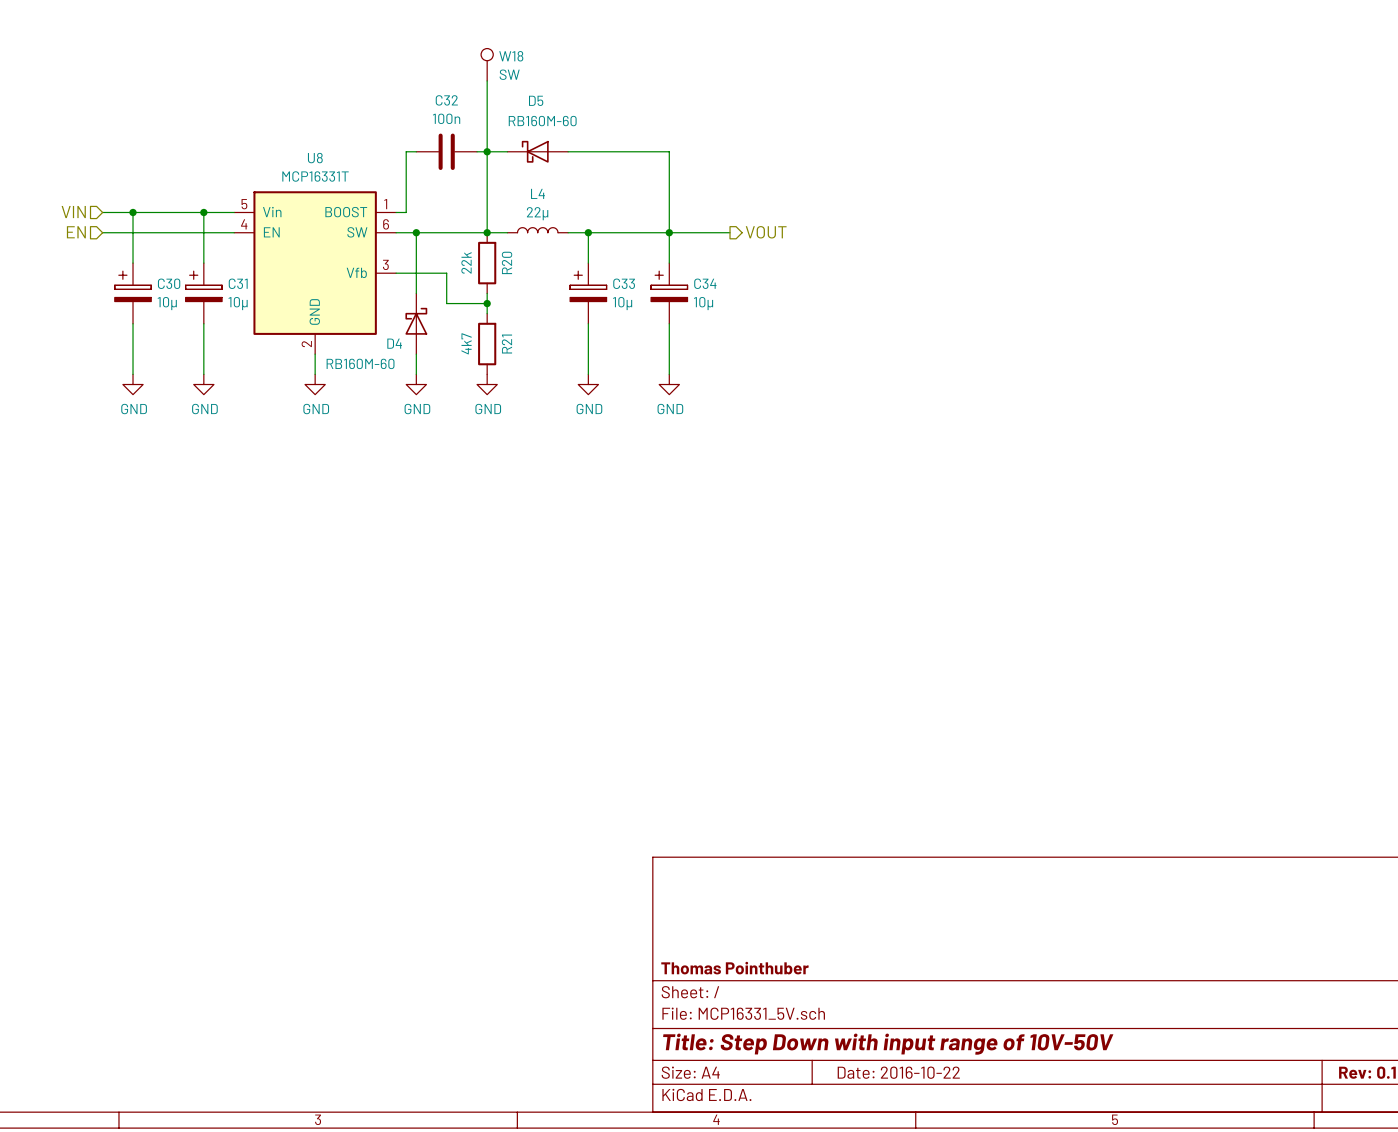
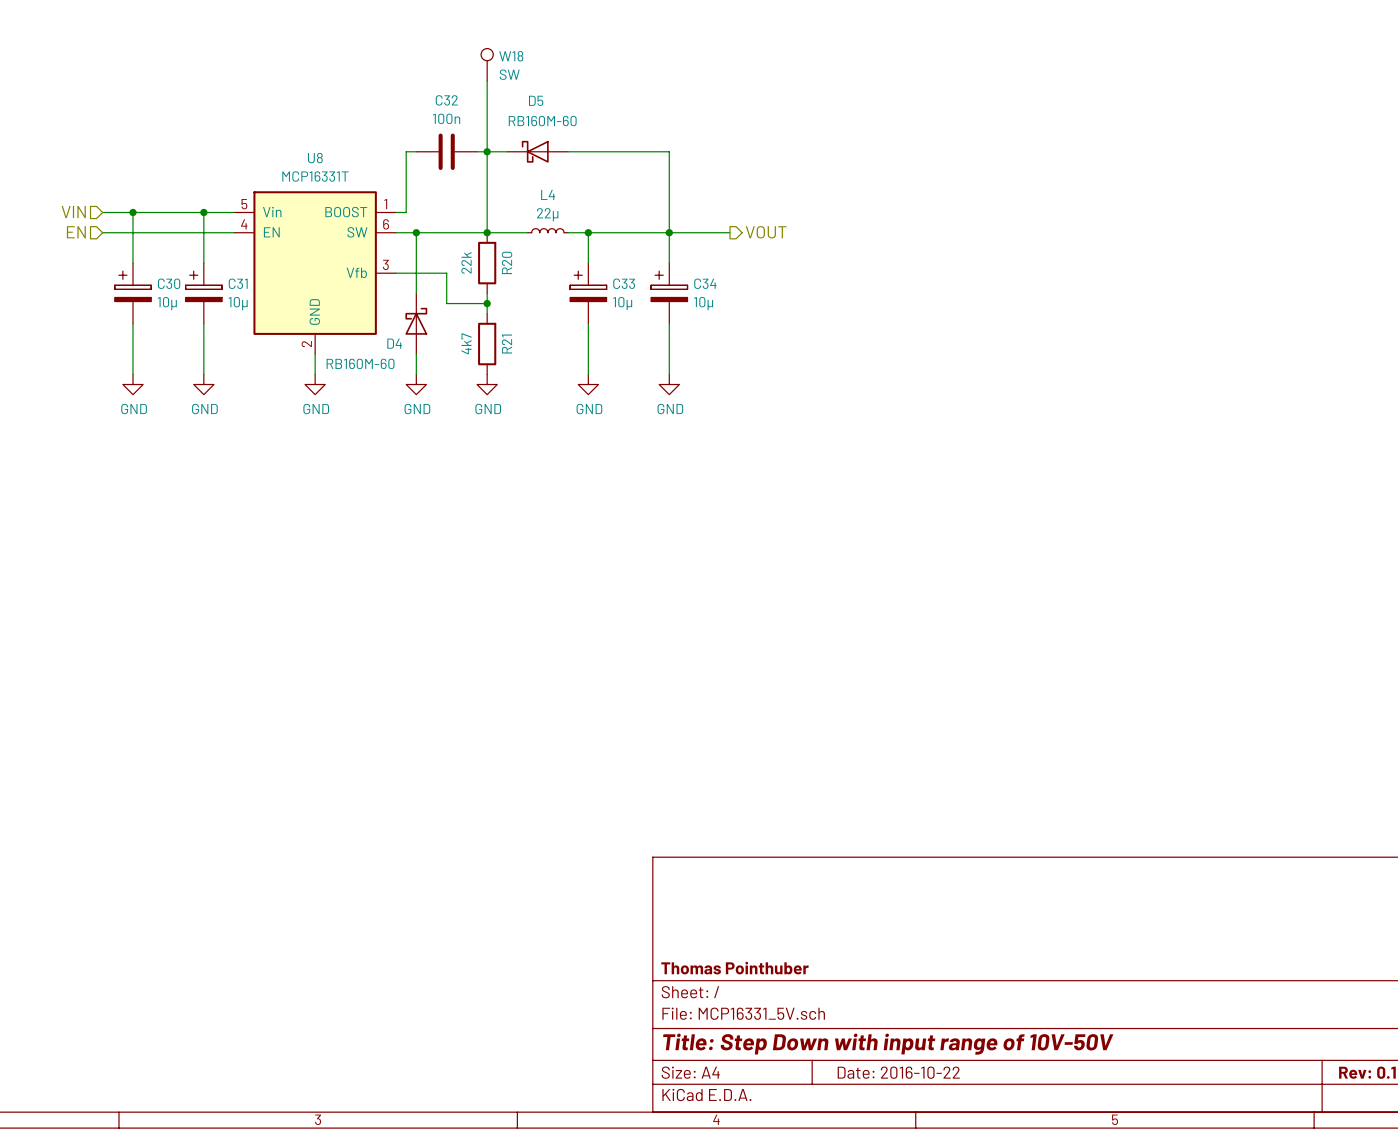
L4 symbol: [507, 227, 569, 233] -> [527, 228, 569, 233]

